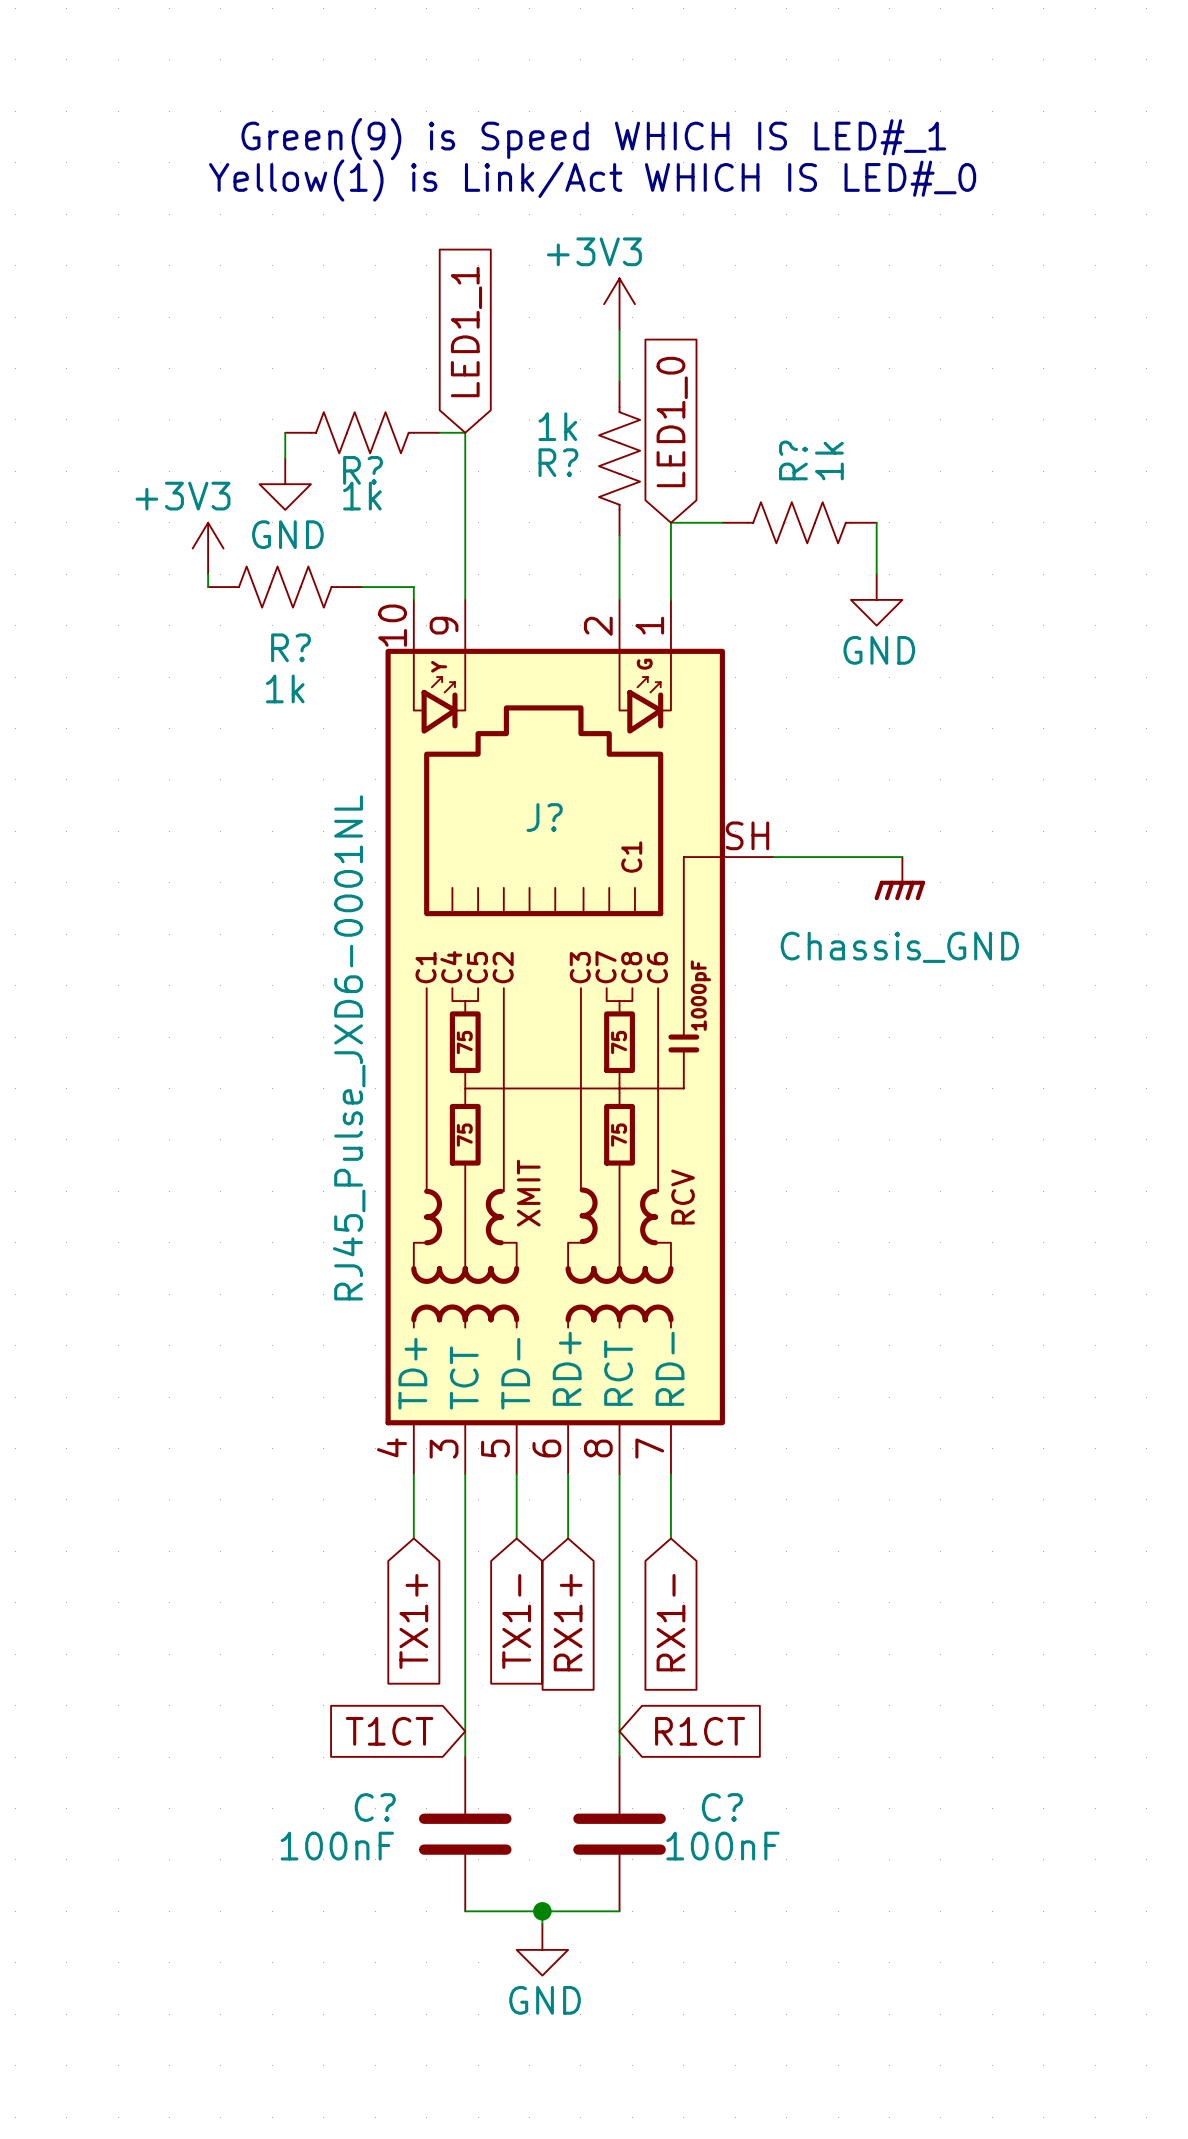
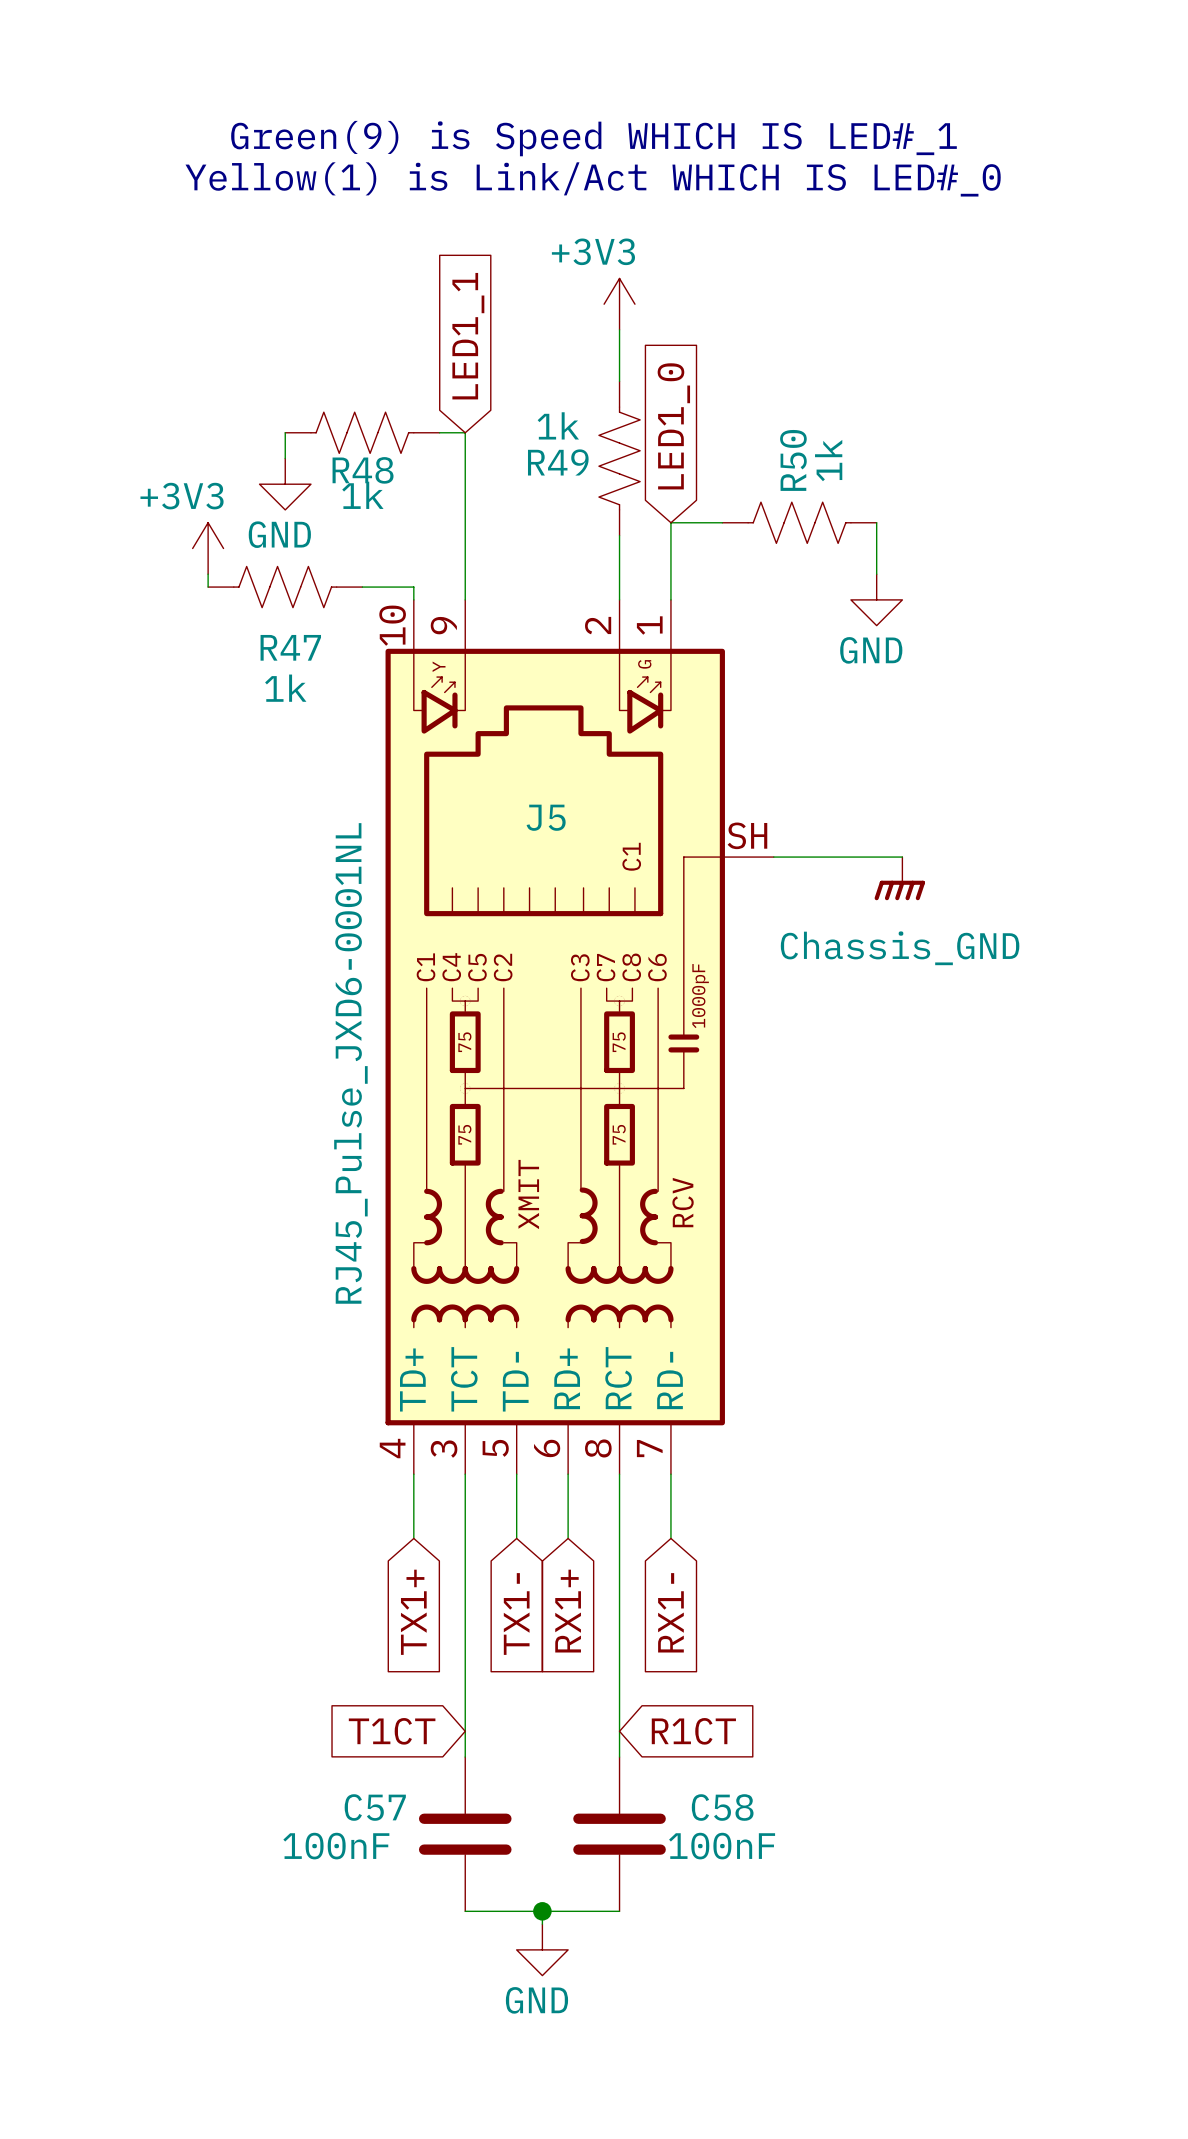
R? name: R? (793, 460) -> R50 (793, 460)
R? name: R? (558, 462) -> R49 (558, 462)
R? name: R? (363, 470) -> R48 (363, 470)
R? name: R? (291, 647) -> R47 (290, 647)
J? name: J? (544, 817) -> J5 (546, 817)
C? name: C? (375, 1807) -> C57 (375, 1807)
C? name: C? (722, 1807) -> C58 (722, 1807)

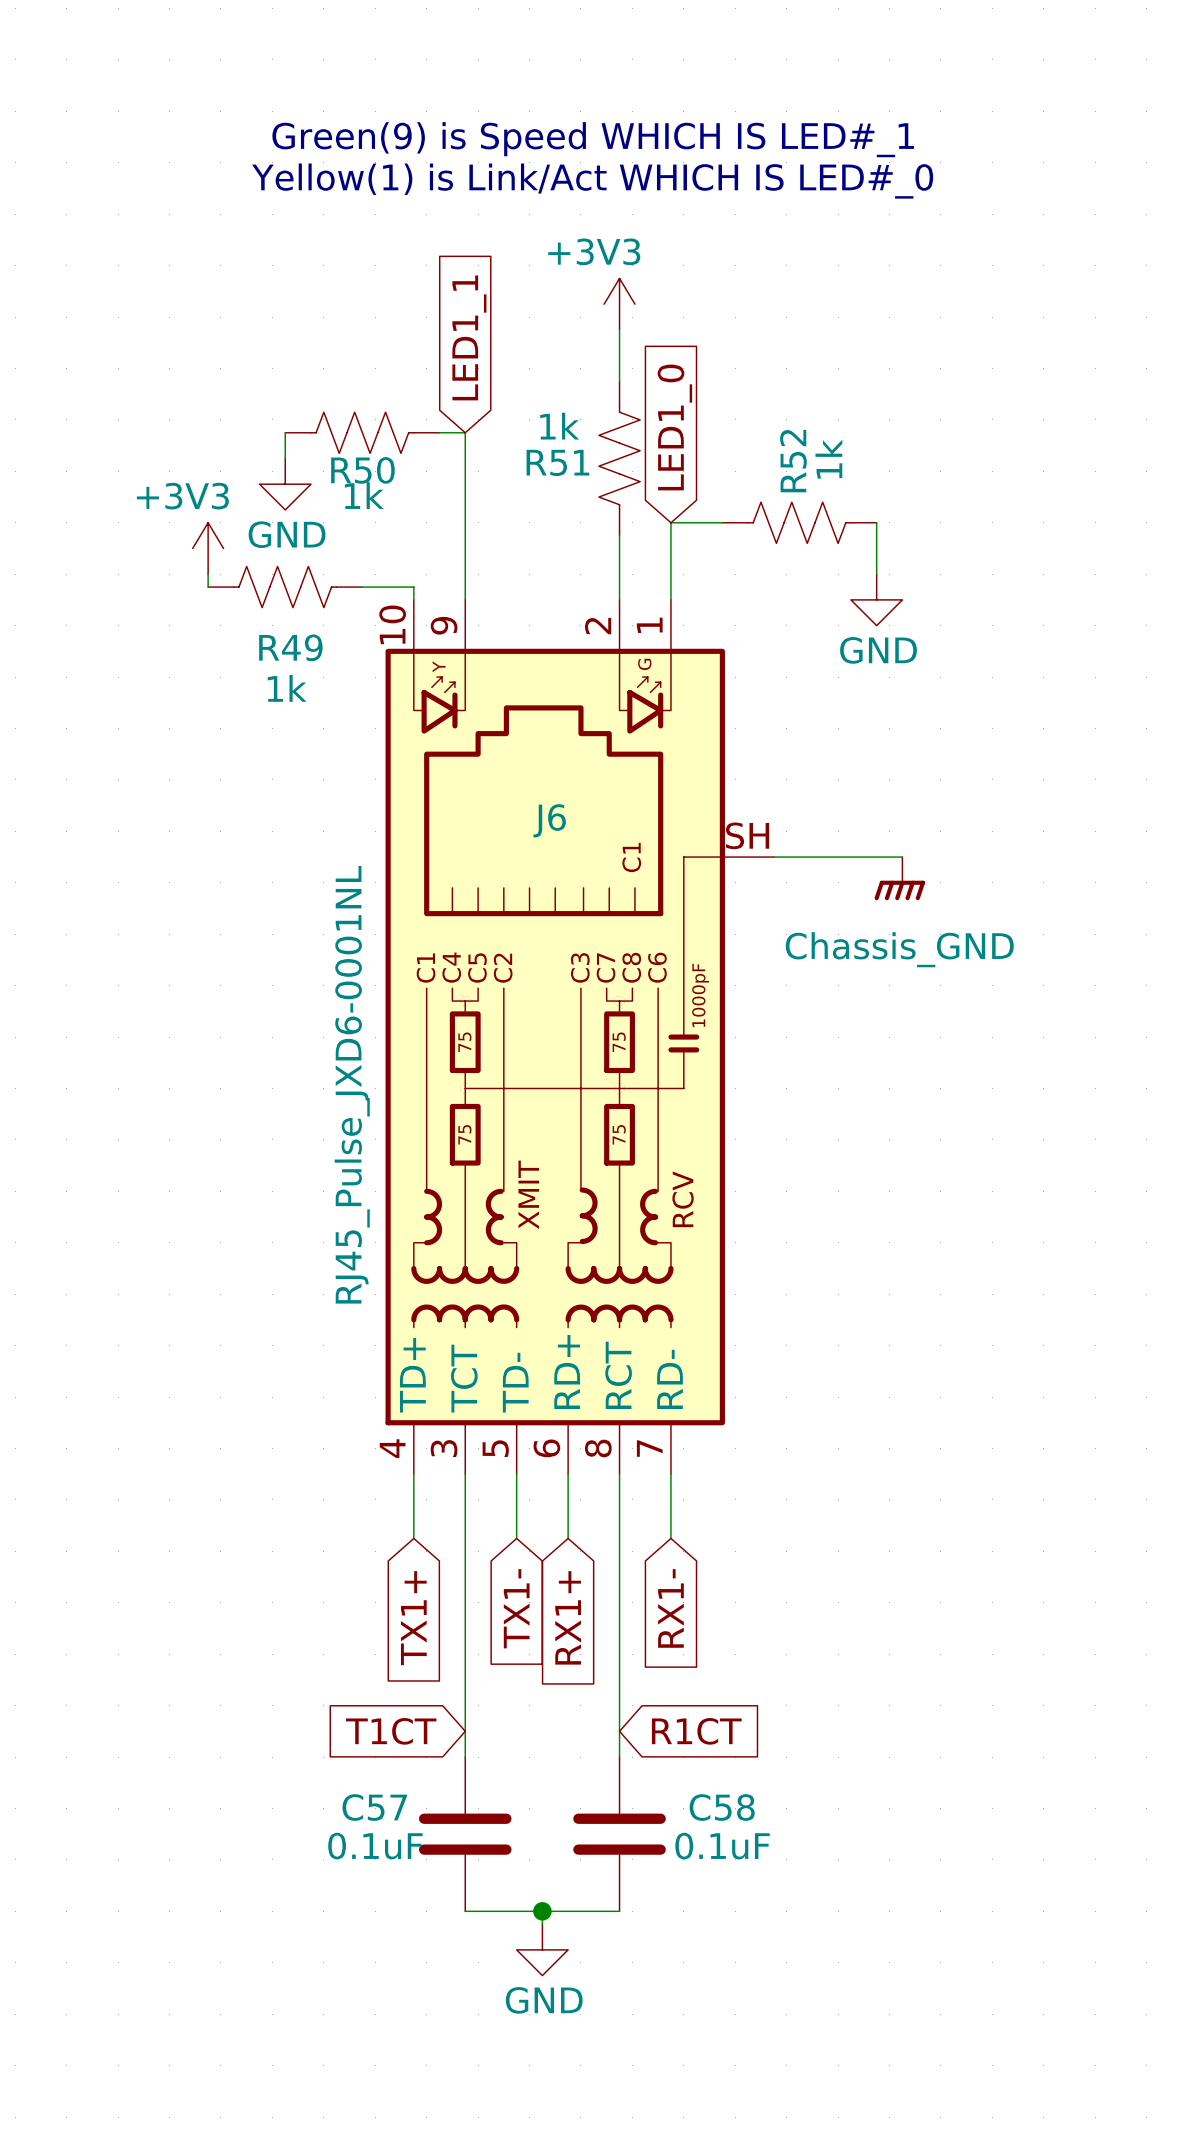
R50 name: R50 (793, 460) -> R52 (793, 461)
R49 name: R49 (558, 462) -> R51 (557, 462)
R48 name: R48 (363, 470) -> R50 (362, 470)
R47 name: R47 (290, 647) -> R49 (290, 647)
J5 name: J5 (546, 817) -> J6 (549, 820)
C57 value: 100nF (336, 1846) -> 0.1uF (375, 1846)
C58 value: 100nF (722, 1846) -> 0.1uF (722, 1846)

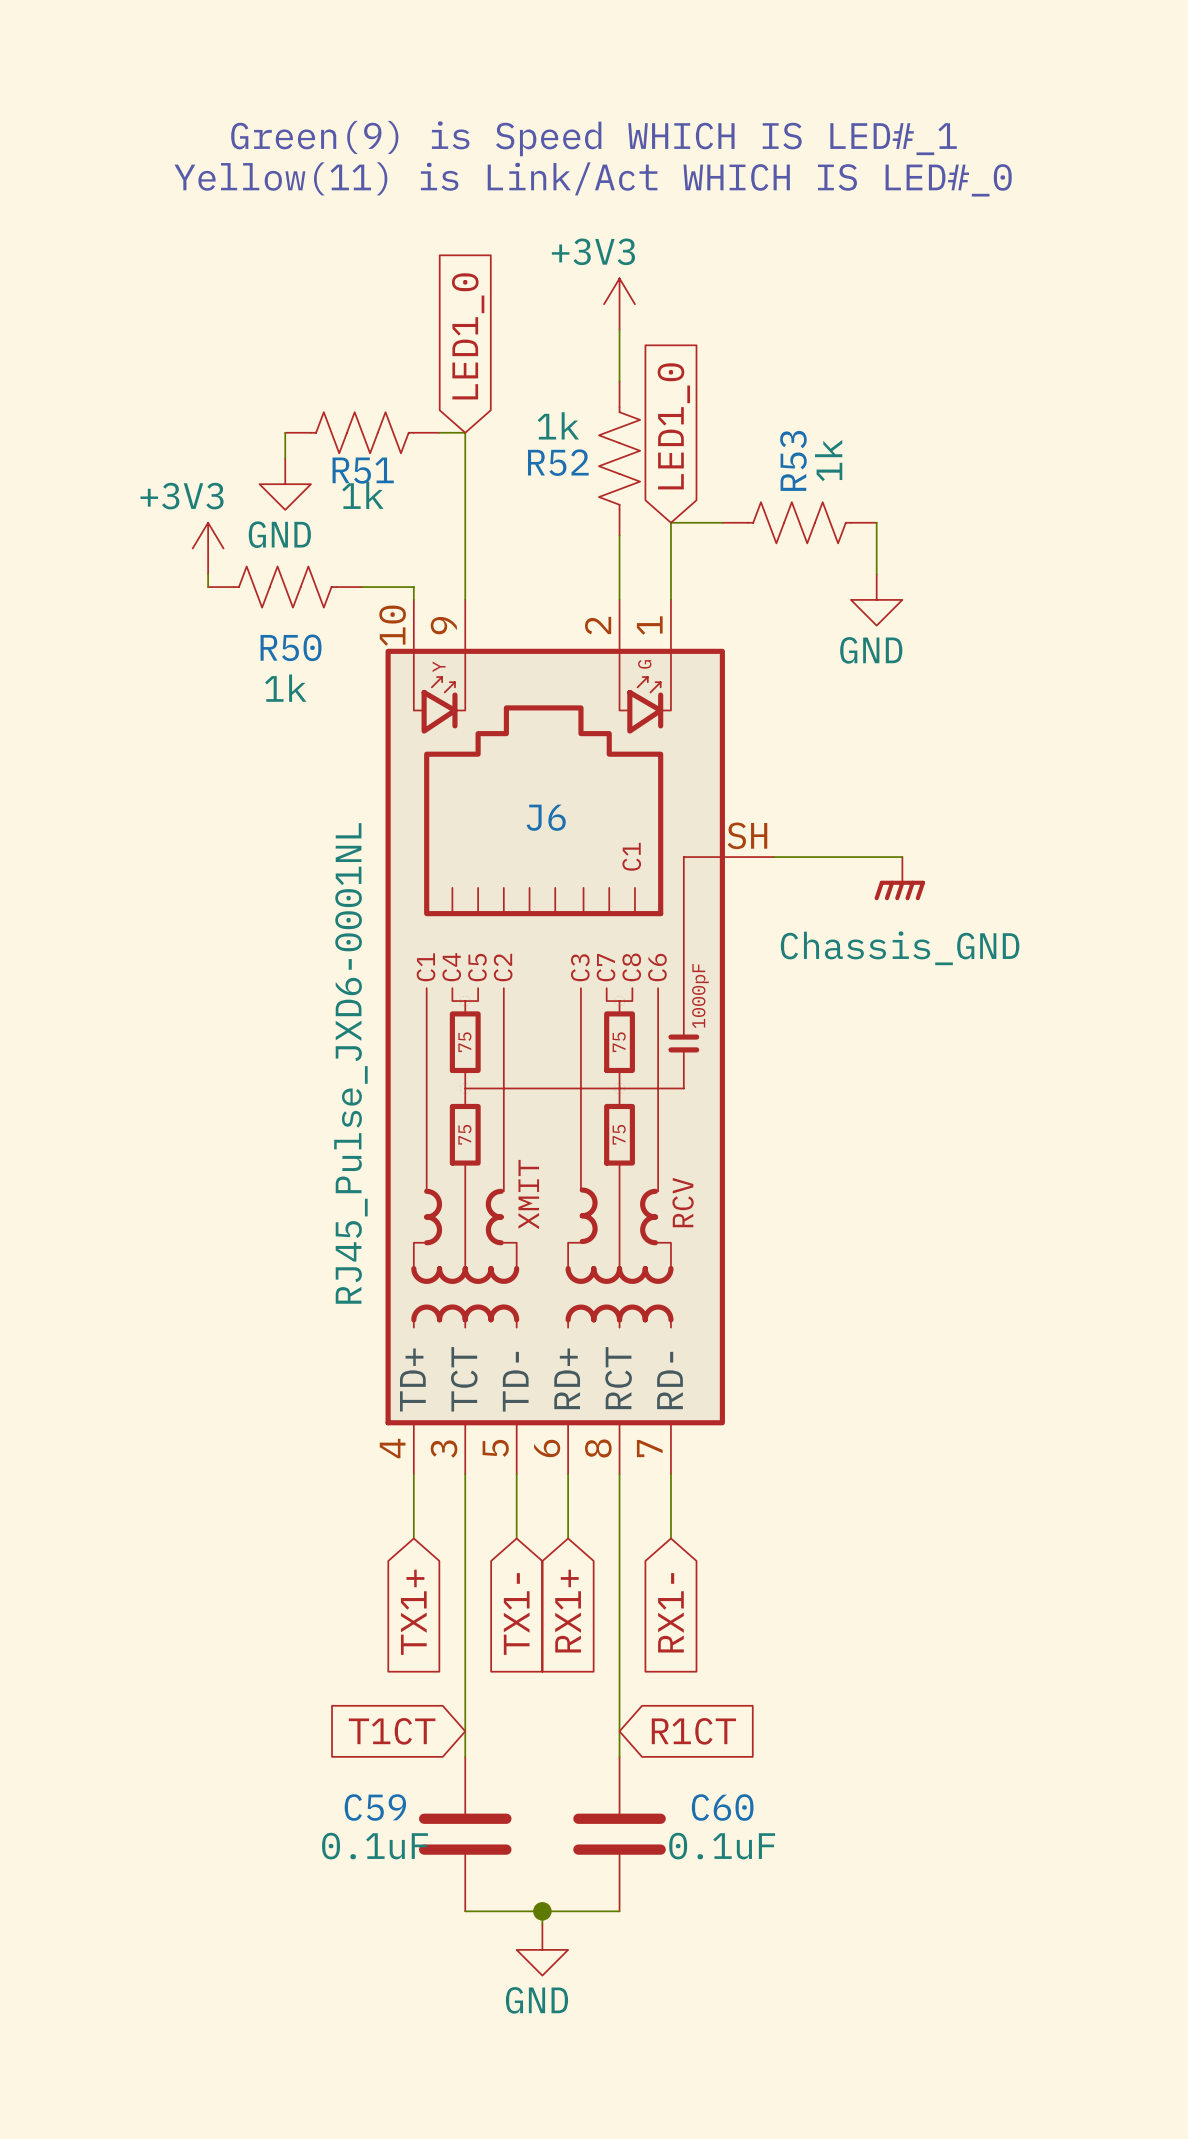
text: Yellow(1) is Link/Act WHICH IS LED#_0 (592, 181) -> Yellow(11) is Link/Act WHICH IS LED#_0 (593, 179)
global label: LED1_1 (469, 337) -> LED1_0 (468, 336)
R52 name: R52 (793, 461) -> R53 (793, 460)
R51 name: R51 (557, 462) -> R52 (558, 462)
R50 name: R50 (362, 470) -> R51 (363, 470)
R49 name: R49 (290, 647) -> R50 (291, 647)
C57 name: C57 (374, 1807) -> C59 (375, 1807)
C58 name: C58 (722, 1807) -> C60 (722, 1807)

